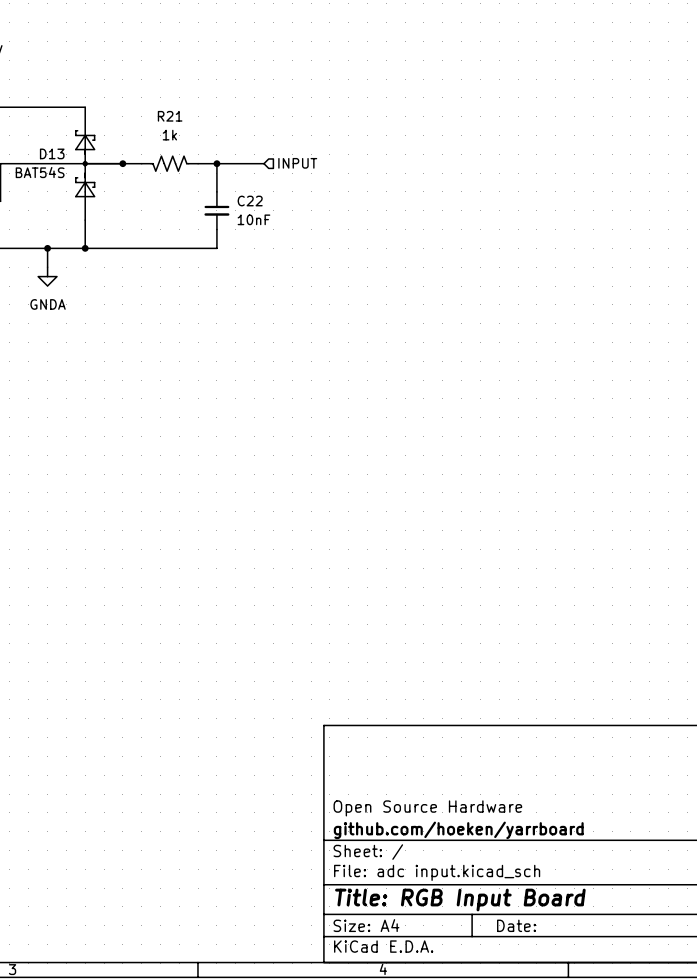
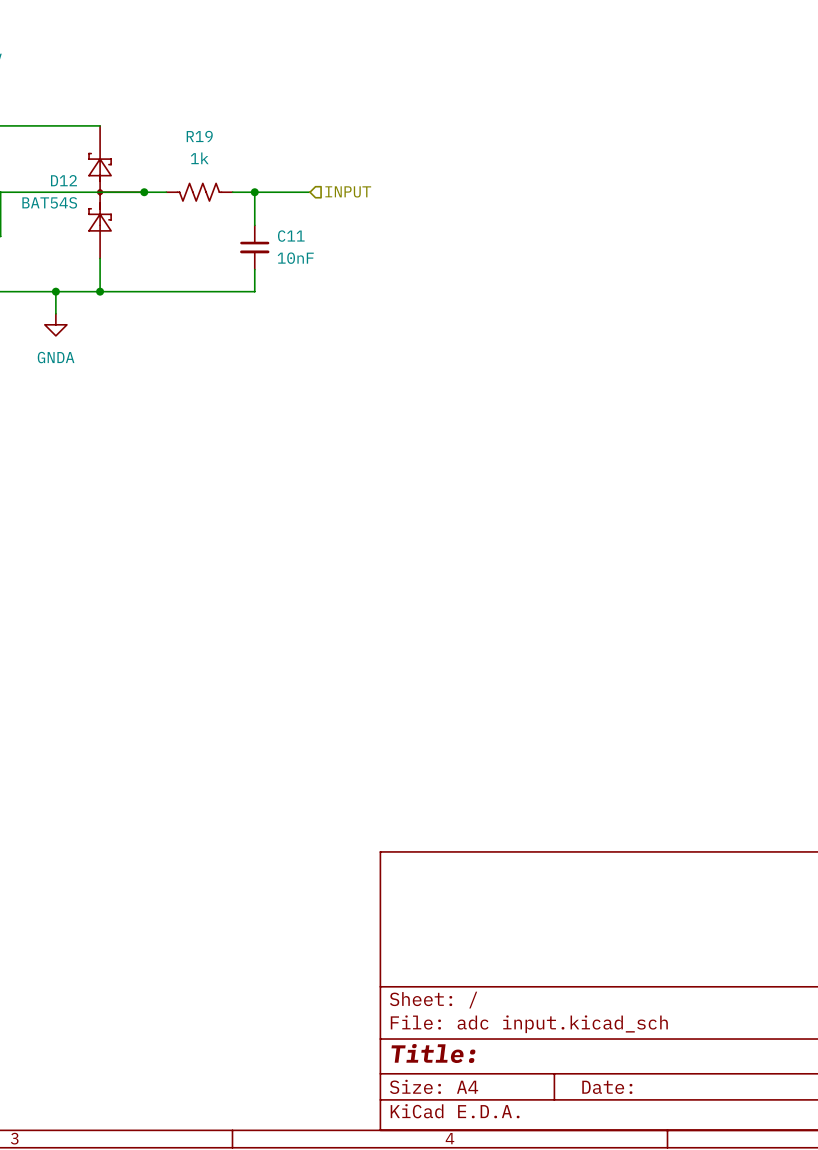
R21 name: R21 (170, 116) -> R19 (199, 136)
D13 name: D13 (52, 153) -> D12 (63, 180)
C22 name: C22 (250, 201) -> C11 (291, 236)
title block: Open Source Hardware (427, 808) -> none
title block: github.com/hoeken/yarrboard (458, 830) -> none
title block: Title: RGB Input Board (460, 900) -> Title: (433, 1053)

